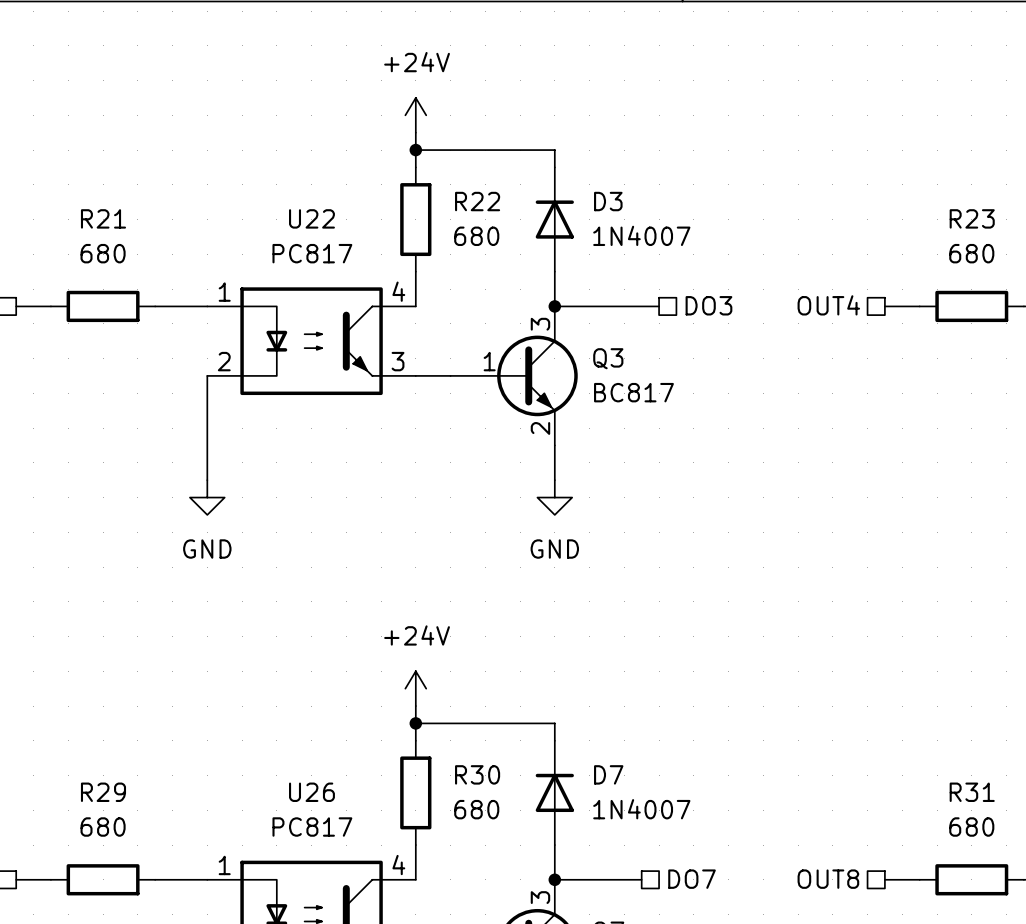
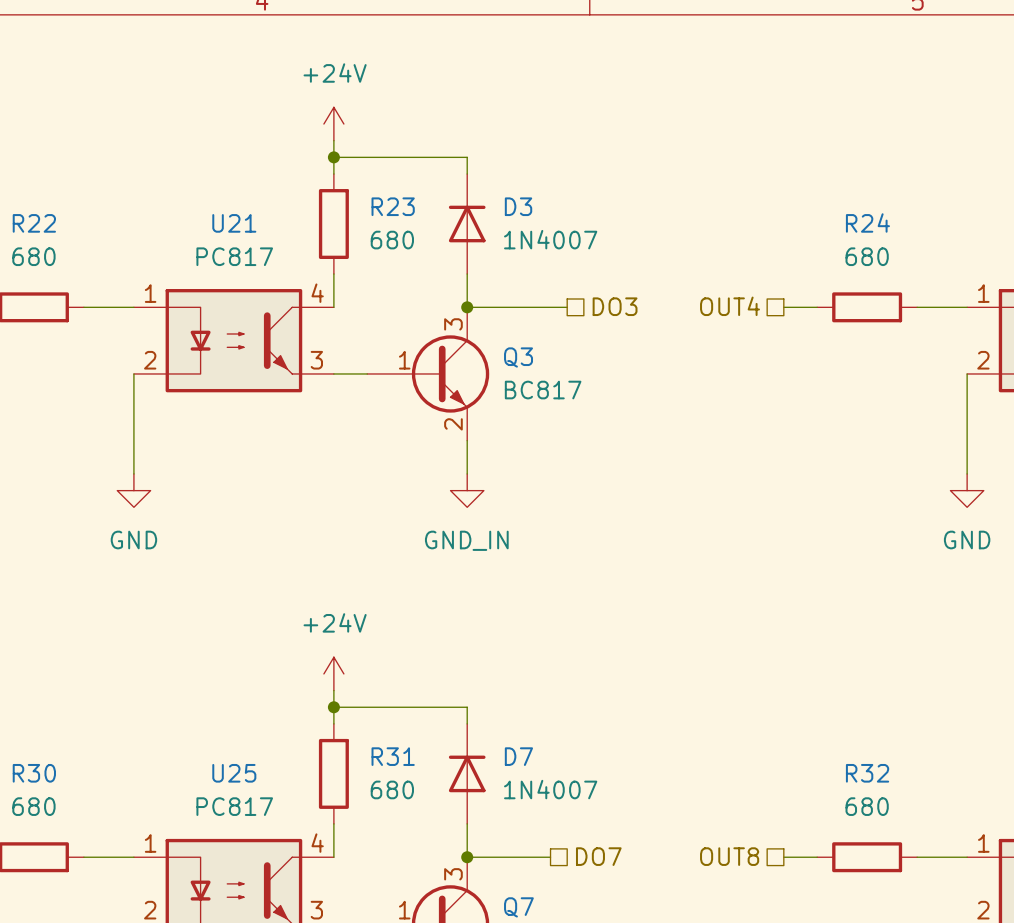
R22 name: R22 (477, 201) -> R23 (393, 206)
R21 name: R21 (103, 218) -> R22 (34, 223)
U22 name: U22 (311, 218) -> U21 (234, 223)
R23 name: R23 (972, 218) -> R24 (867, 222)
power symbol: GND (554, 497) -> GND_IN (467, 490)
R30 name: R30 (477, 774) -> R31 (393, 756)
R29 name: R29 (103, 792) -> R30 (34, 773)
U26 name: U26 (311, 792) -> U25 (234, 773)
R31 name: R31 (972, 792) -> R32 (867, 773)

